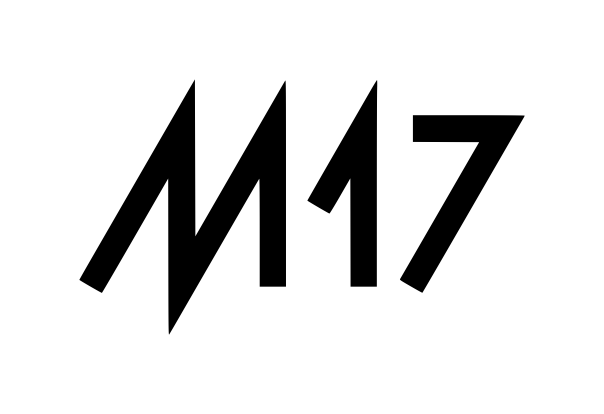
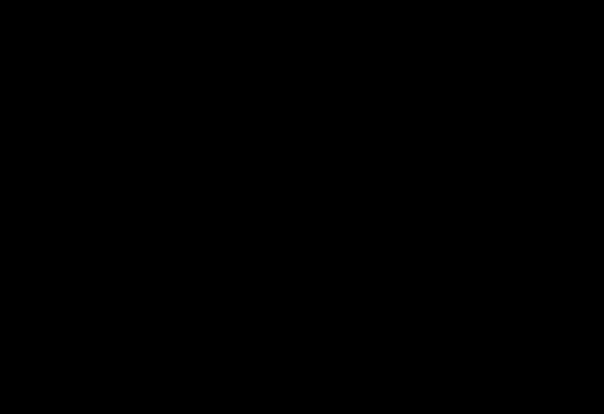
drawing: [79, 79, 525, 335] -> none

